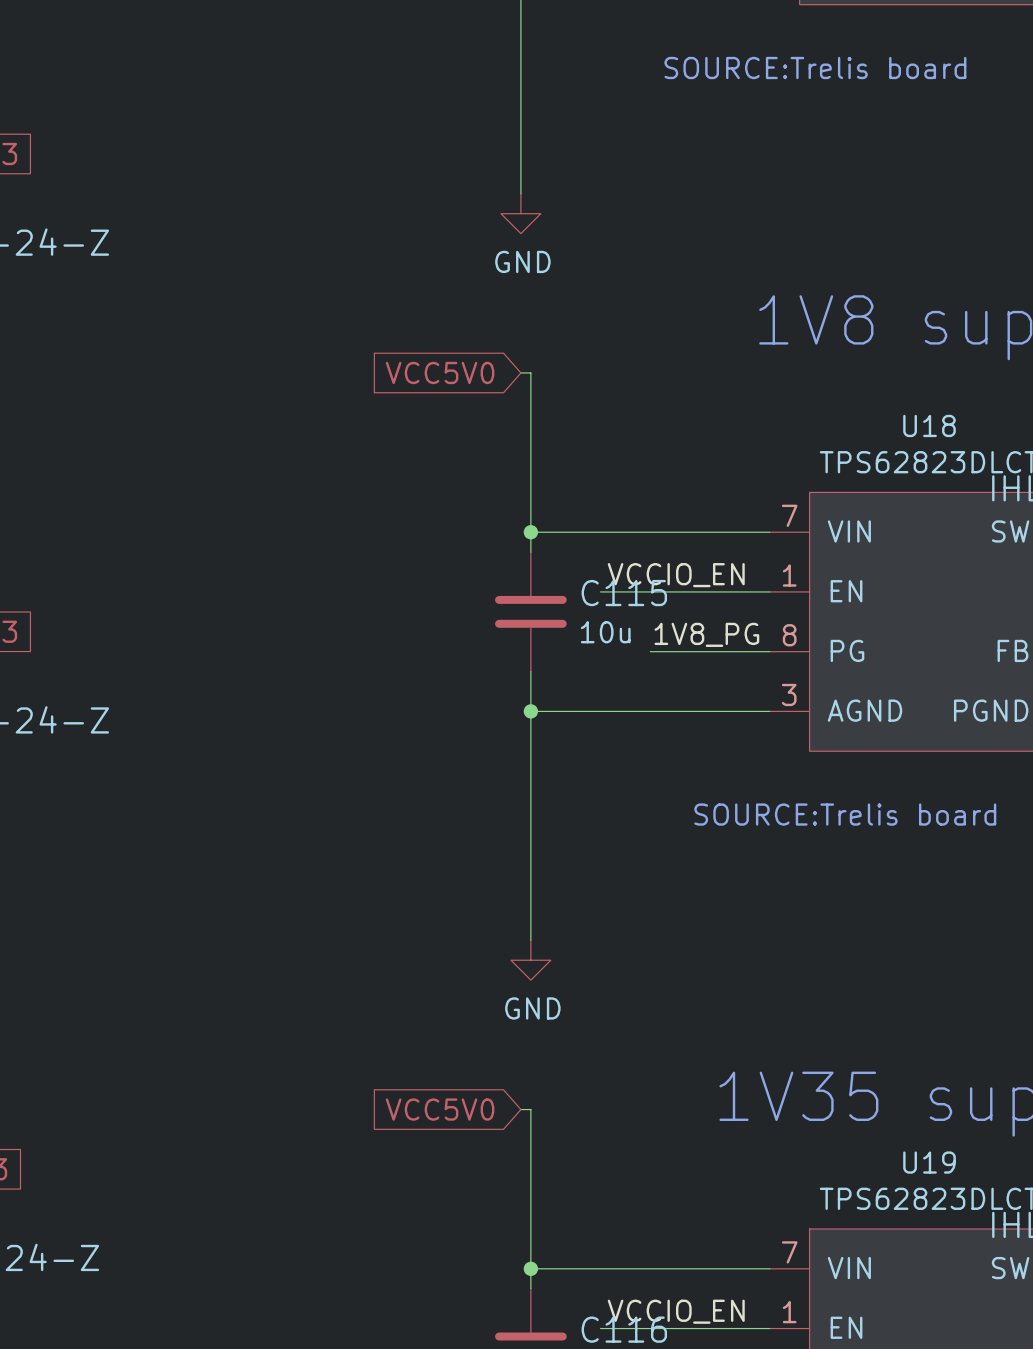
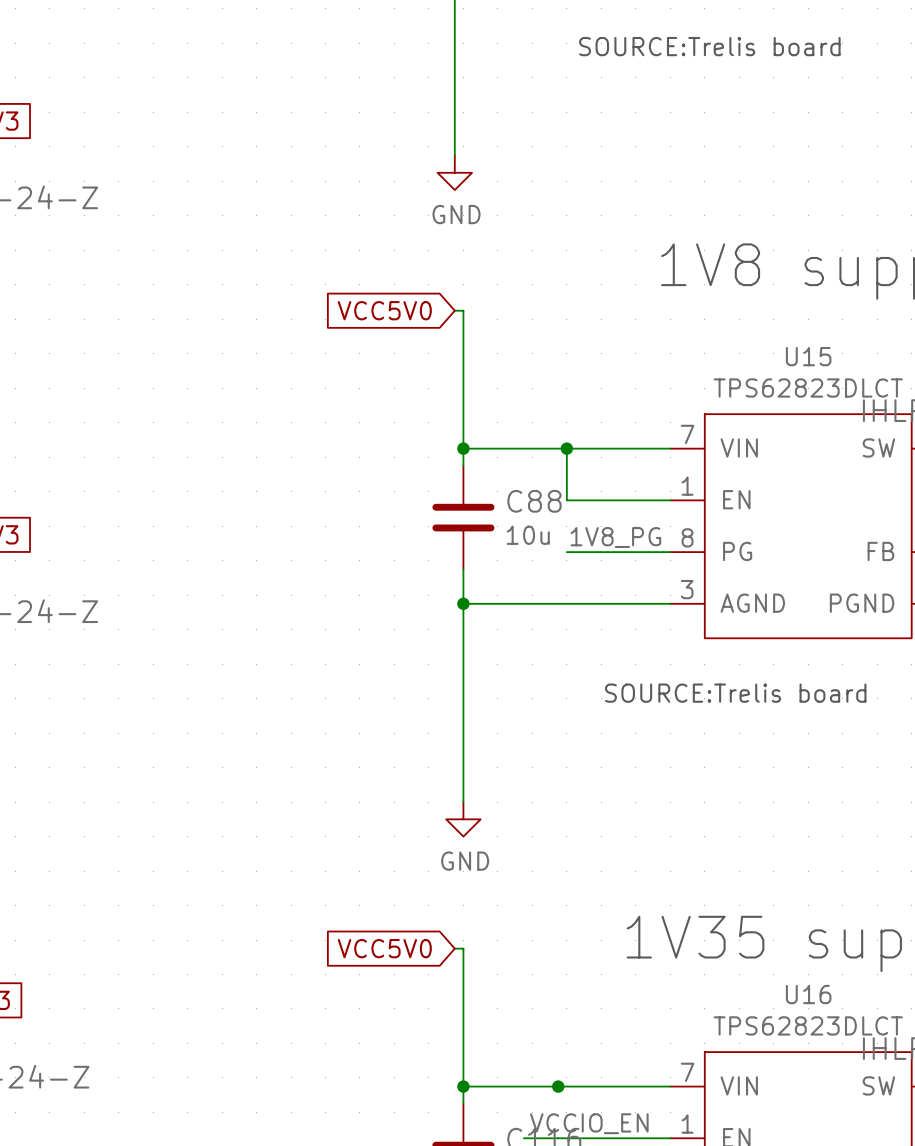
U18 name: U18 (929, 425) -> U15 (808, 356)
junction: none -> (566, 448)
label: VCCIO_EN (676, 575) -> none
wire: (600, 591) (650, 591) -> (566, 448) (566, 500)
C115 name: C115 (624, 593) -> C88 (534, 501)
U19 name: U19 (929, 1162) -> U16 (808, 994)
junction: none -> (558, 1086)

